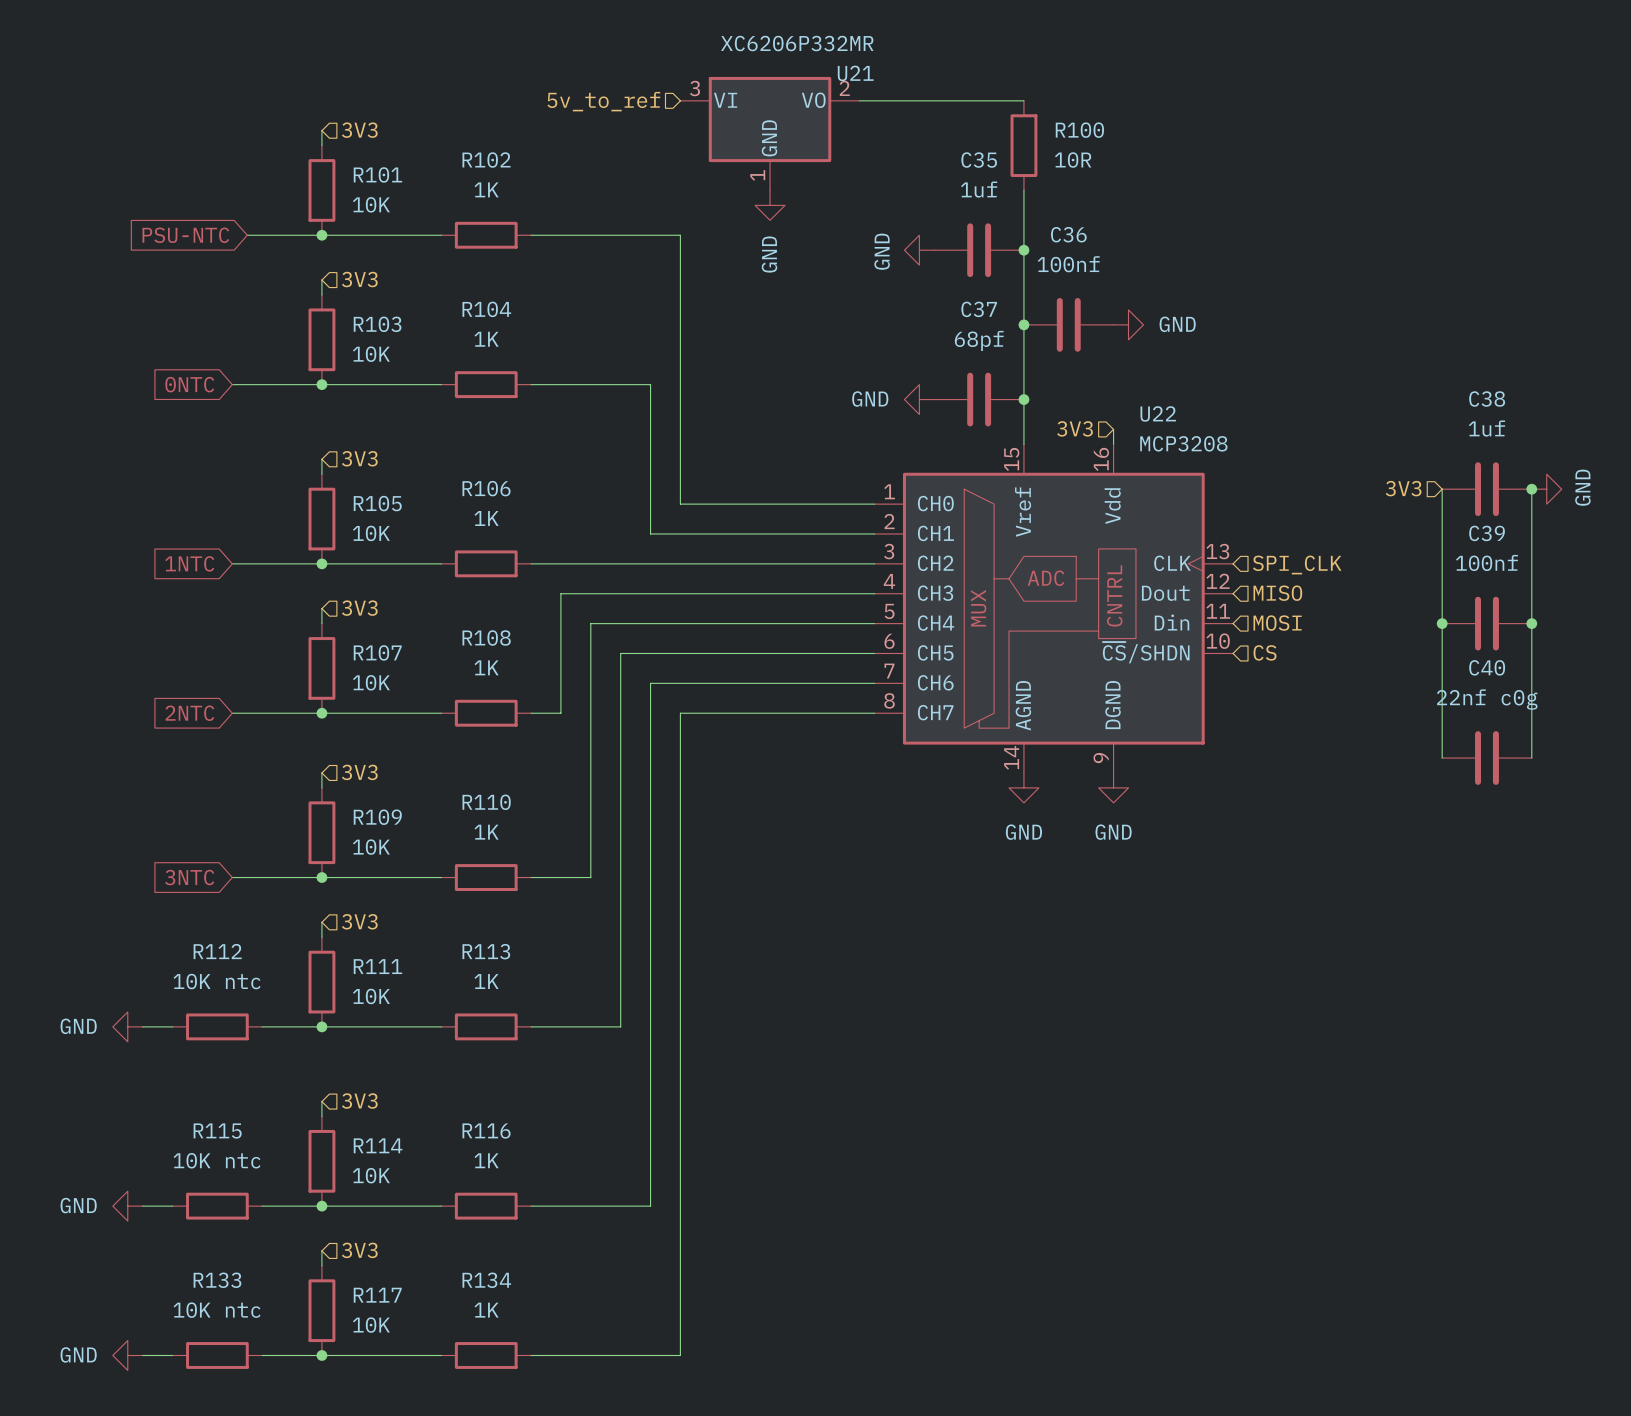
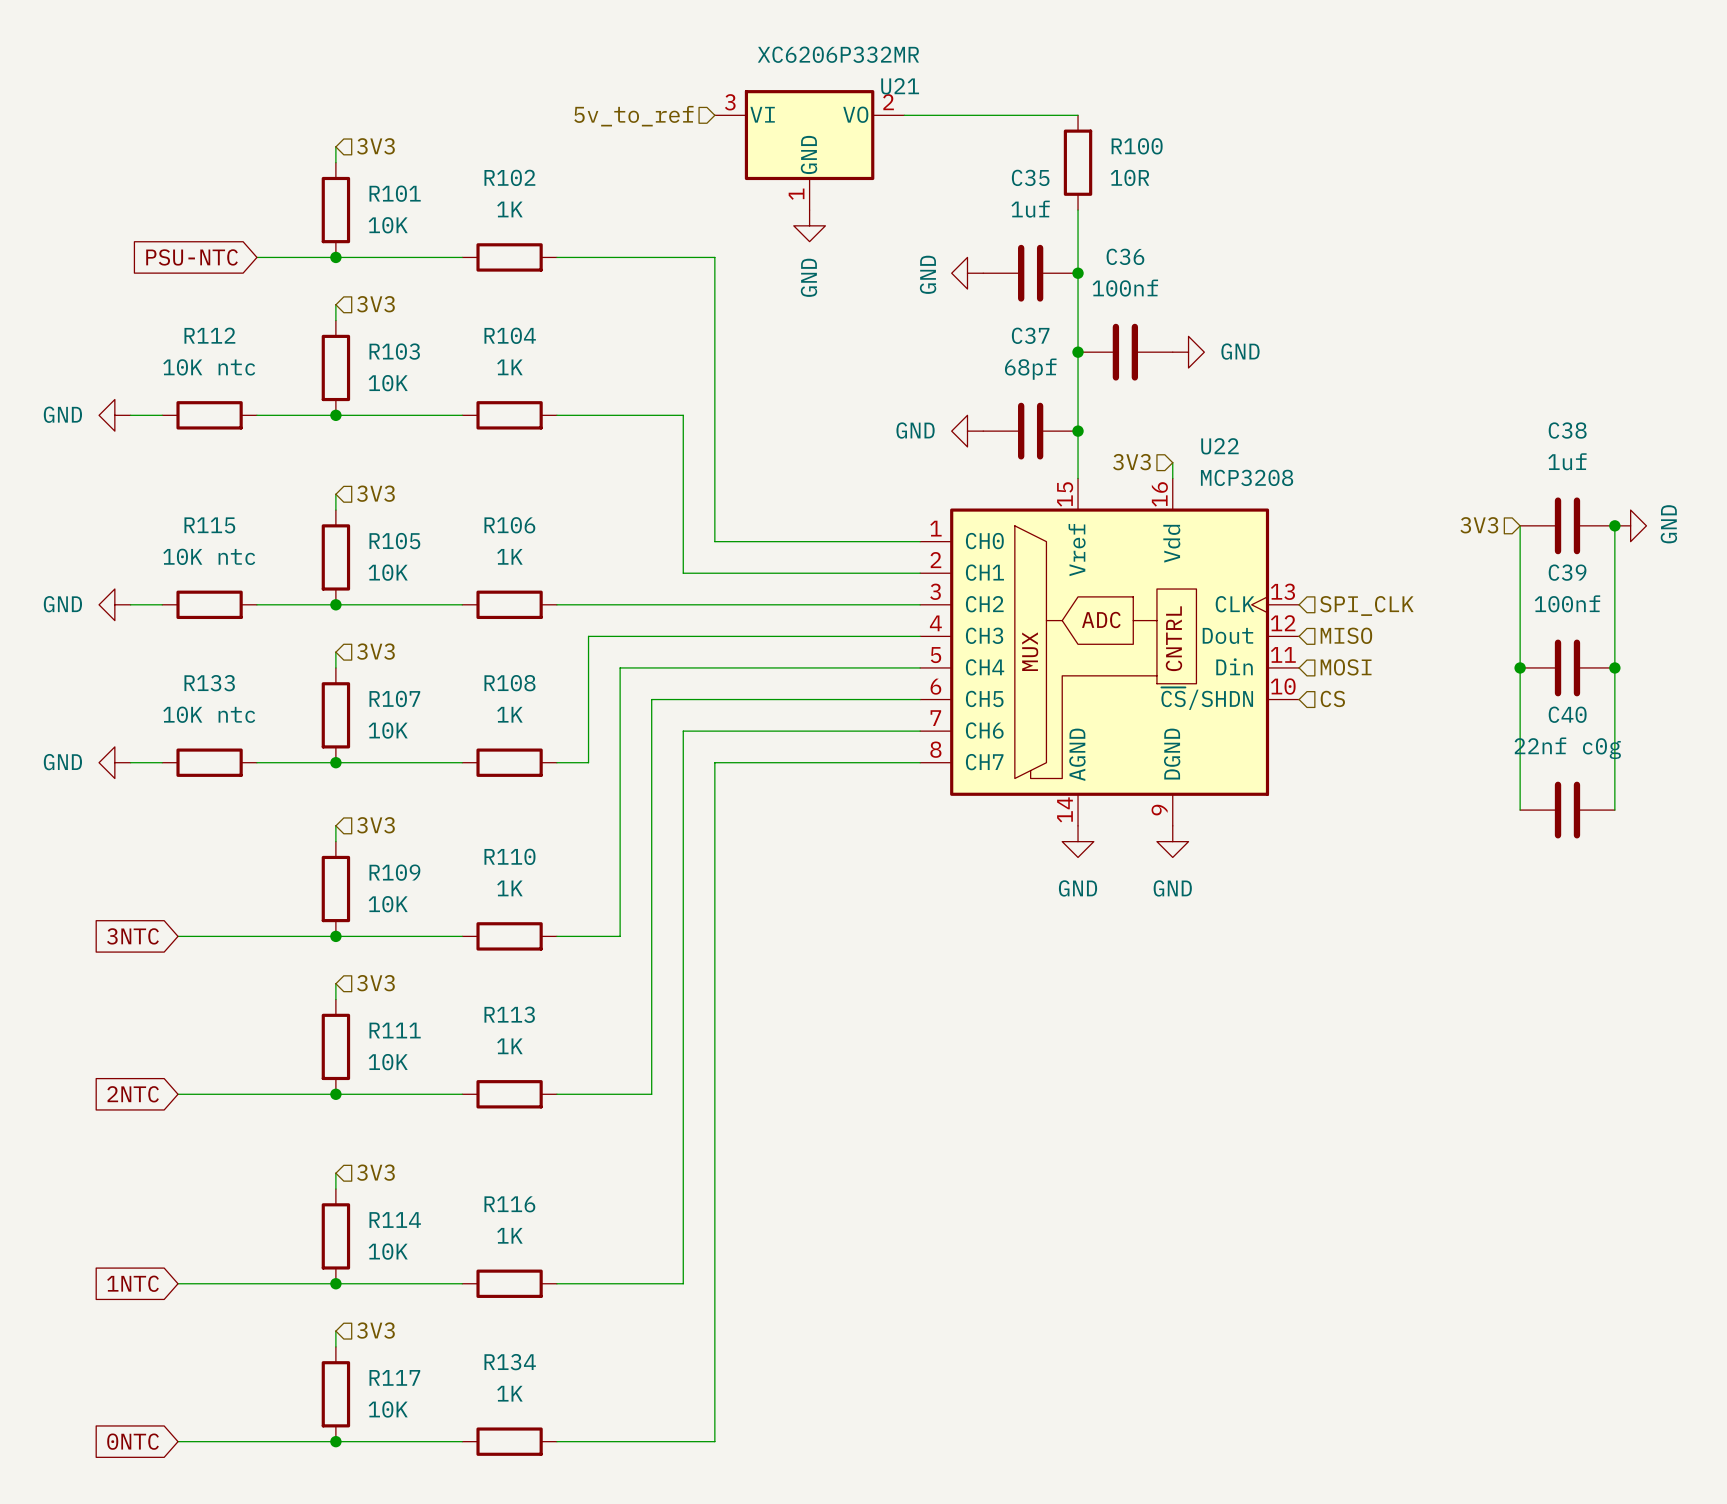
power symbol: none -> GND (114, 415)
wire: none -> (130, 415) (162, 415)
global label: 0NTC (189, 384) -> none
power symbol: none -> GND (114, 604)
wire: none -> (130, 604) (162, 604)
global label: 1NTC (189, 563) -> none
power symbol: none -> GND (114, 762)
wire: none -> (130, 762) (162, 762)
global label: 2NTC (189, 713) -> none
wire: none -> (178, 936) (241, 936)
global label position: 3NTC (189, 877) -> 3NTC (132, 936)
power symbol: GND (127, 1026) -> none
global label: none -> 2NTC (133, 1094)
wire: (142, 1026) (172, 1026) -> (272, 1094) (178, 1094)
R112 position: (217, 1026) -> (209, 415)
power symbol: GND (127, 1206) -> none
global label: none -> 1NTC (132, 1283)
wire: (142, 1206) (172, 1206) -> (272, 1283) (178, 1283)
R115 position: (217, 1206) -> (209, 604)
power symbol: GND (127, 1355) -> none
global label: none -> 0NTC (133, 1441)
wire: (142, 1355) (172, 1355) -> (272, 1441) (178, 1441)
R133 position: (217, 1355) -> (209, 762)

